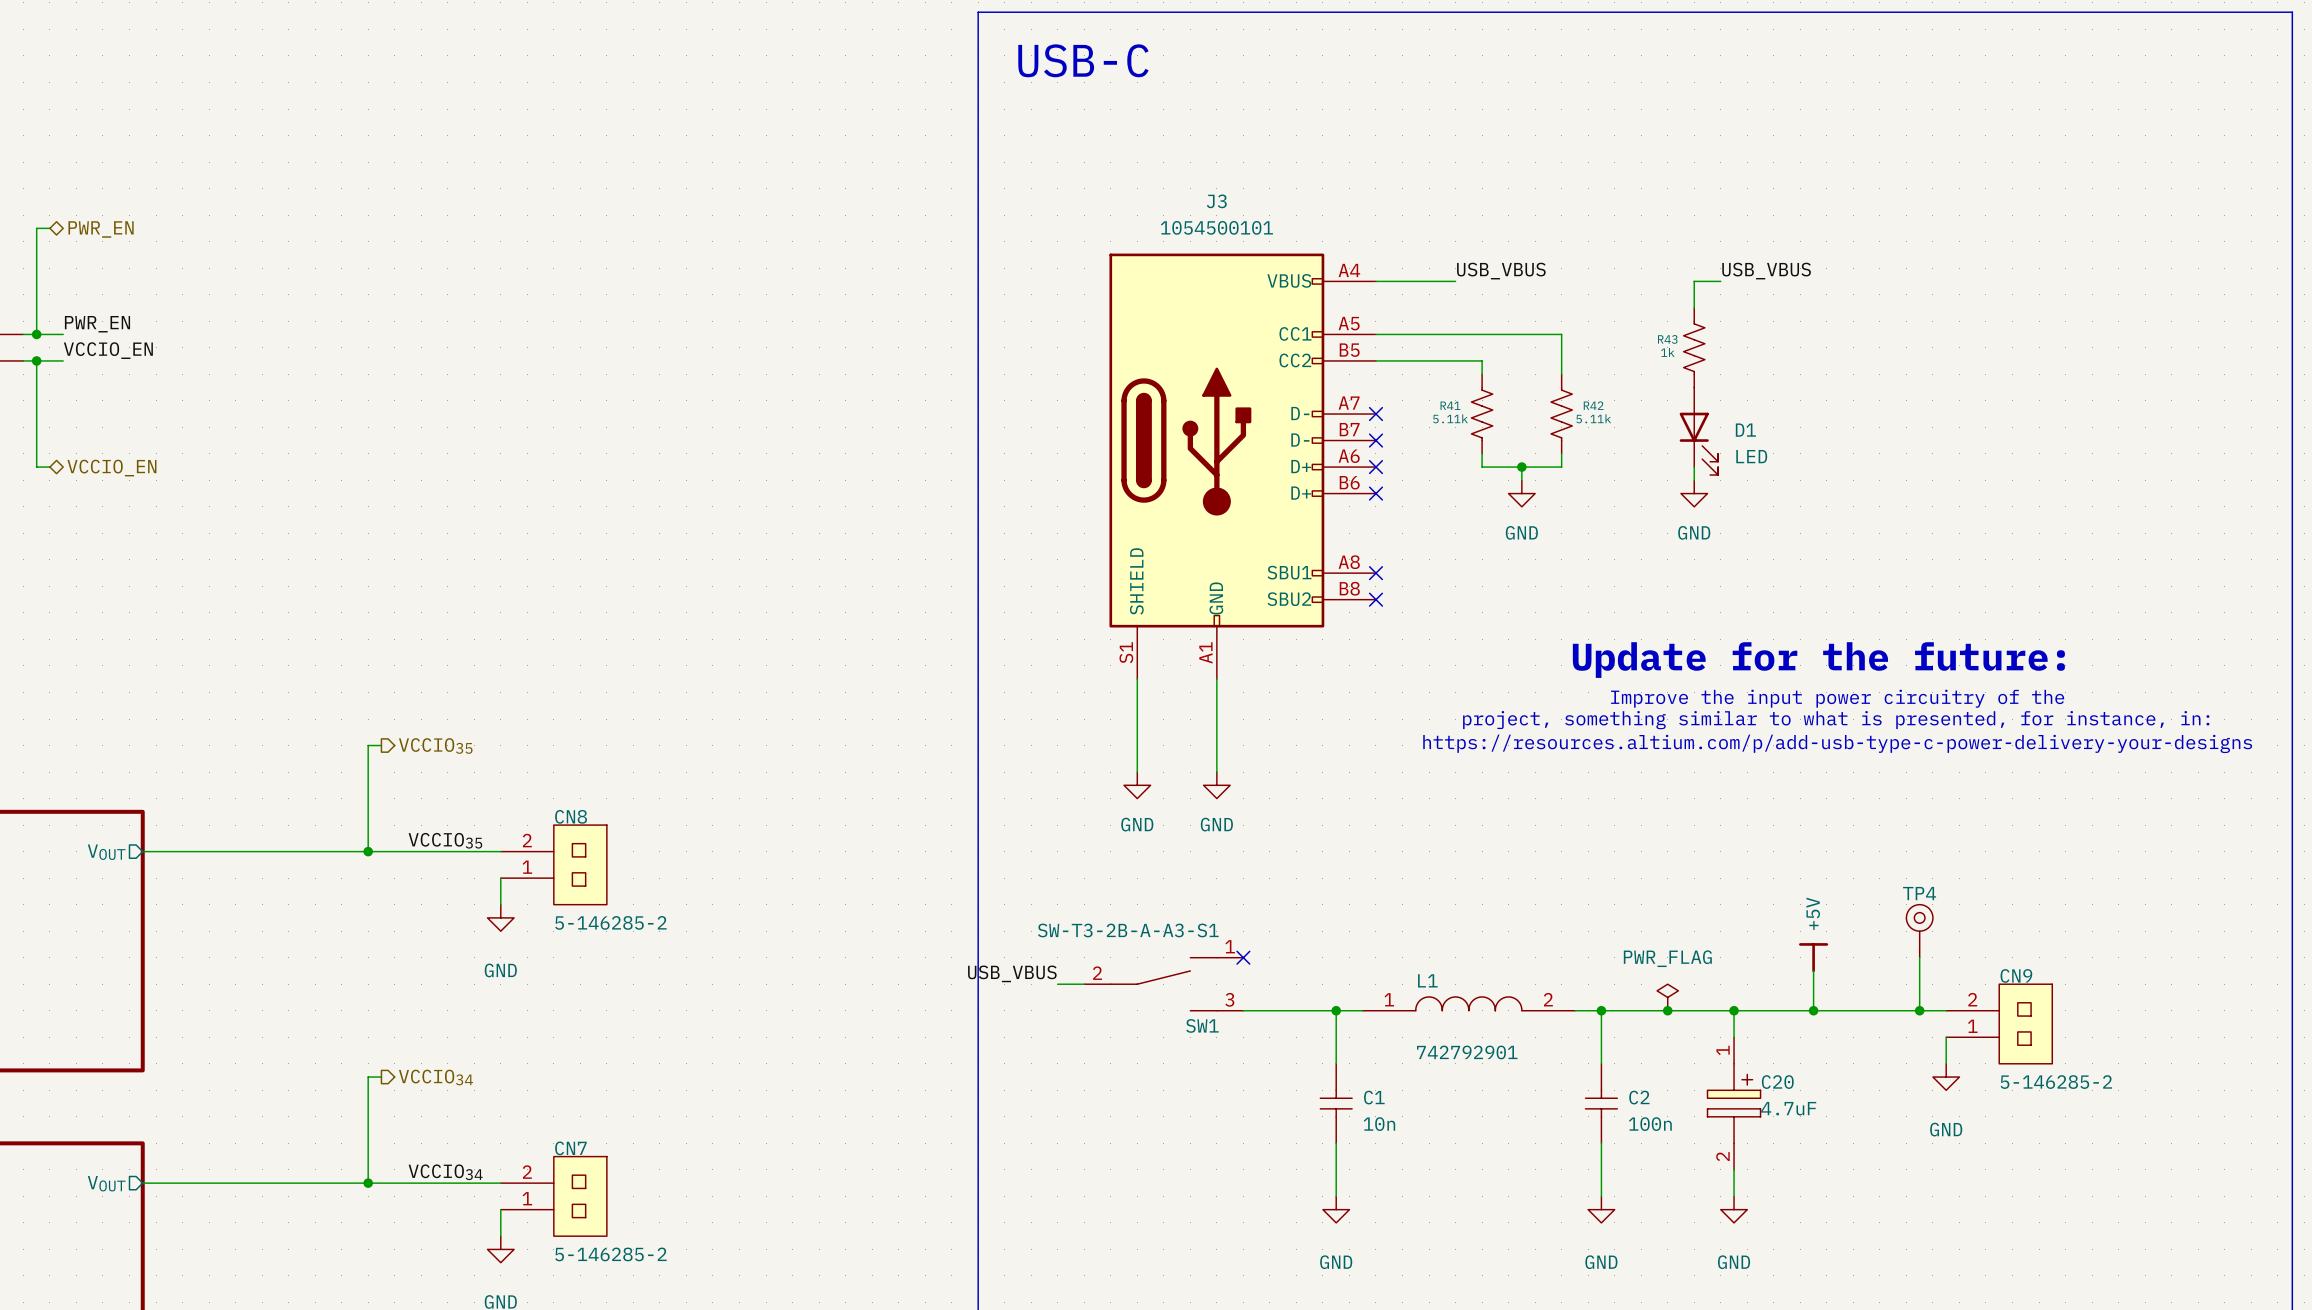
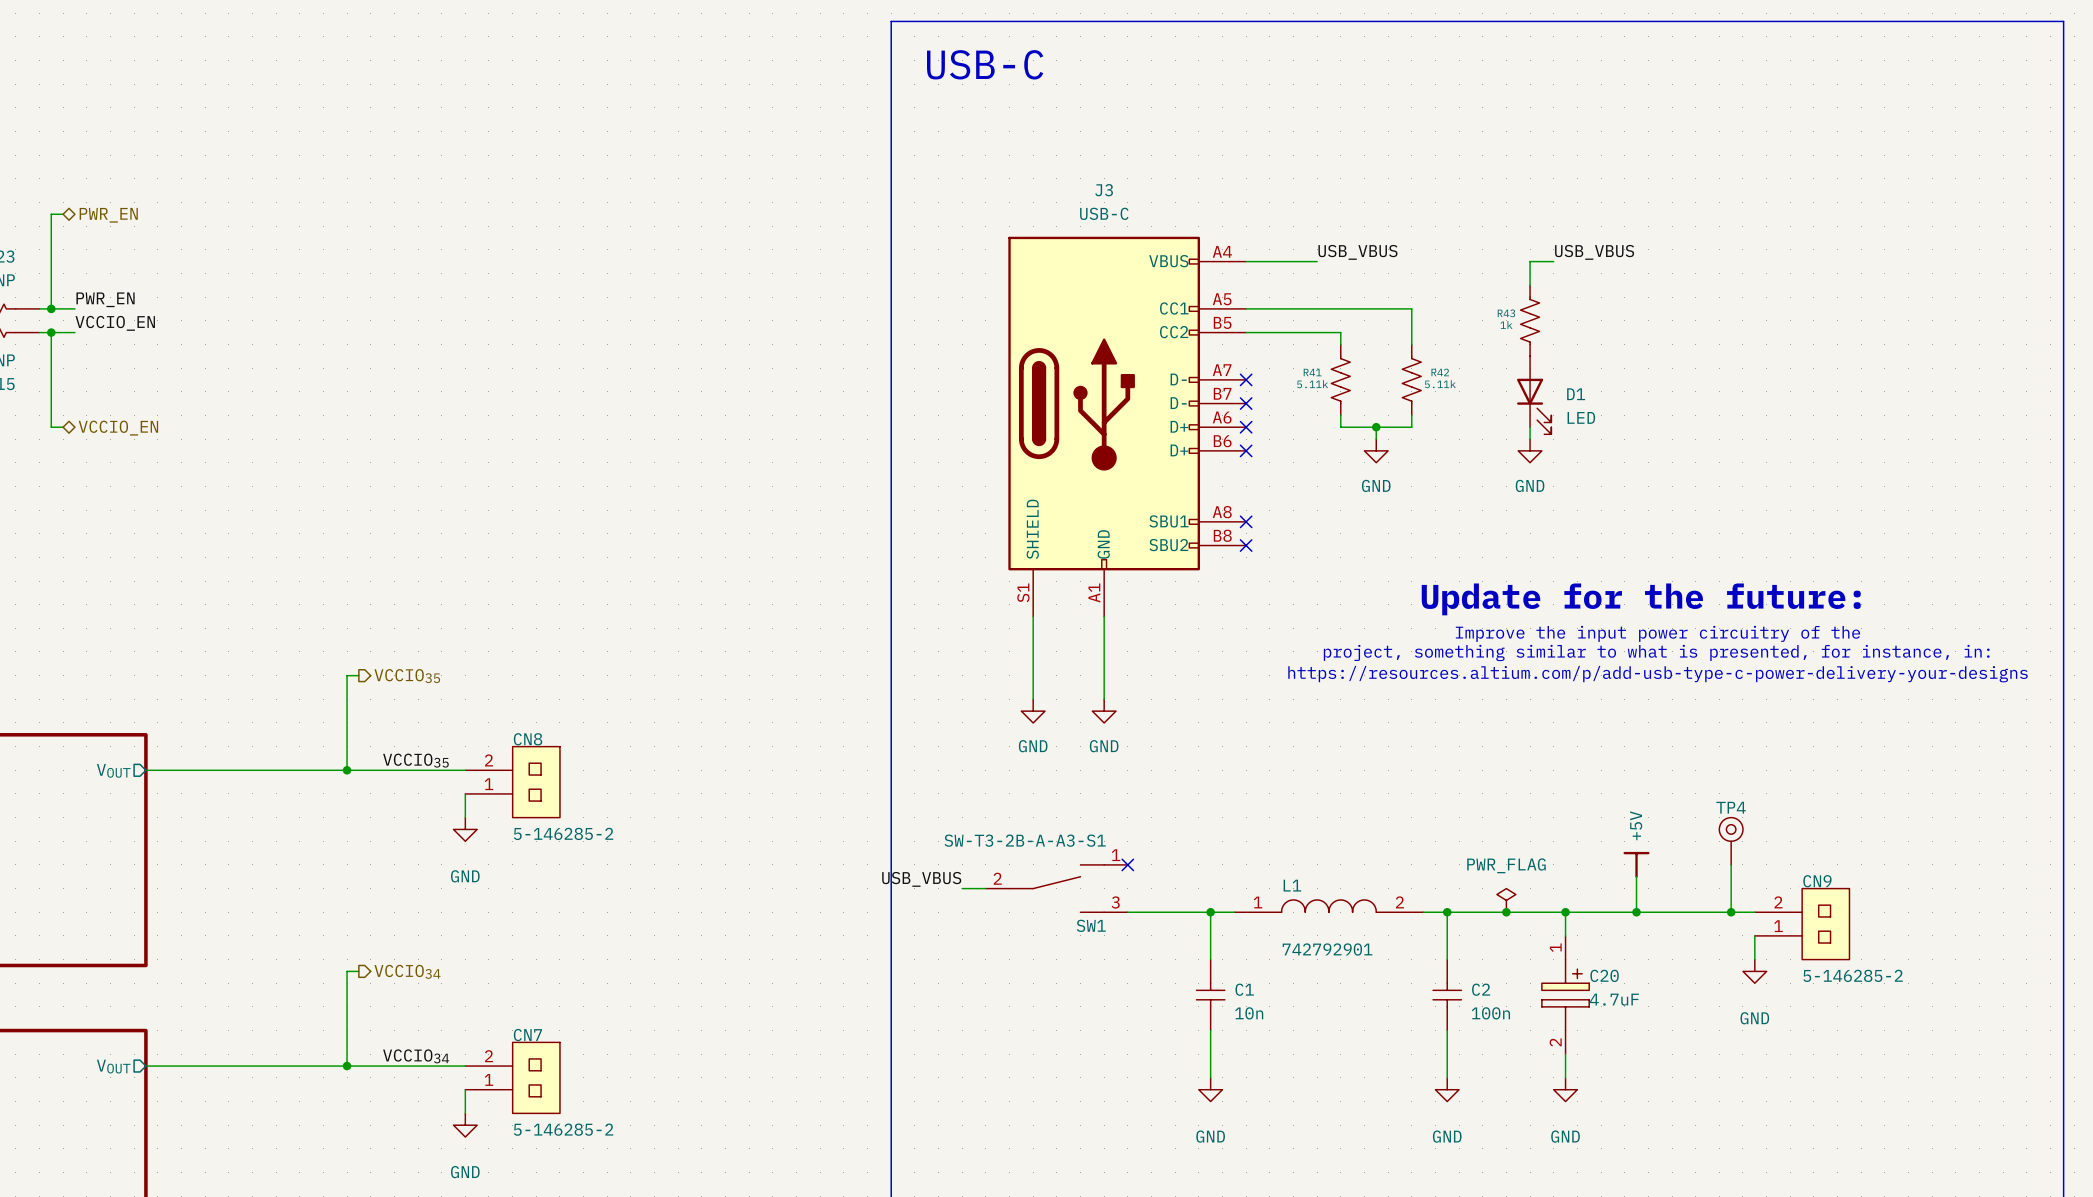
J3 value: 1054500101 (1216, 227) -> USB-C (1104, 213)

